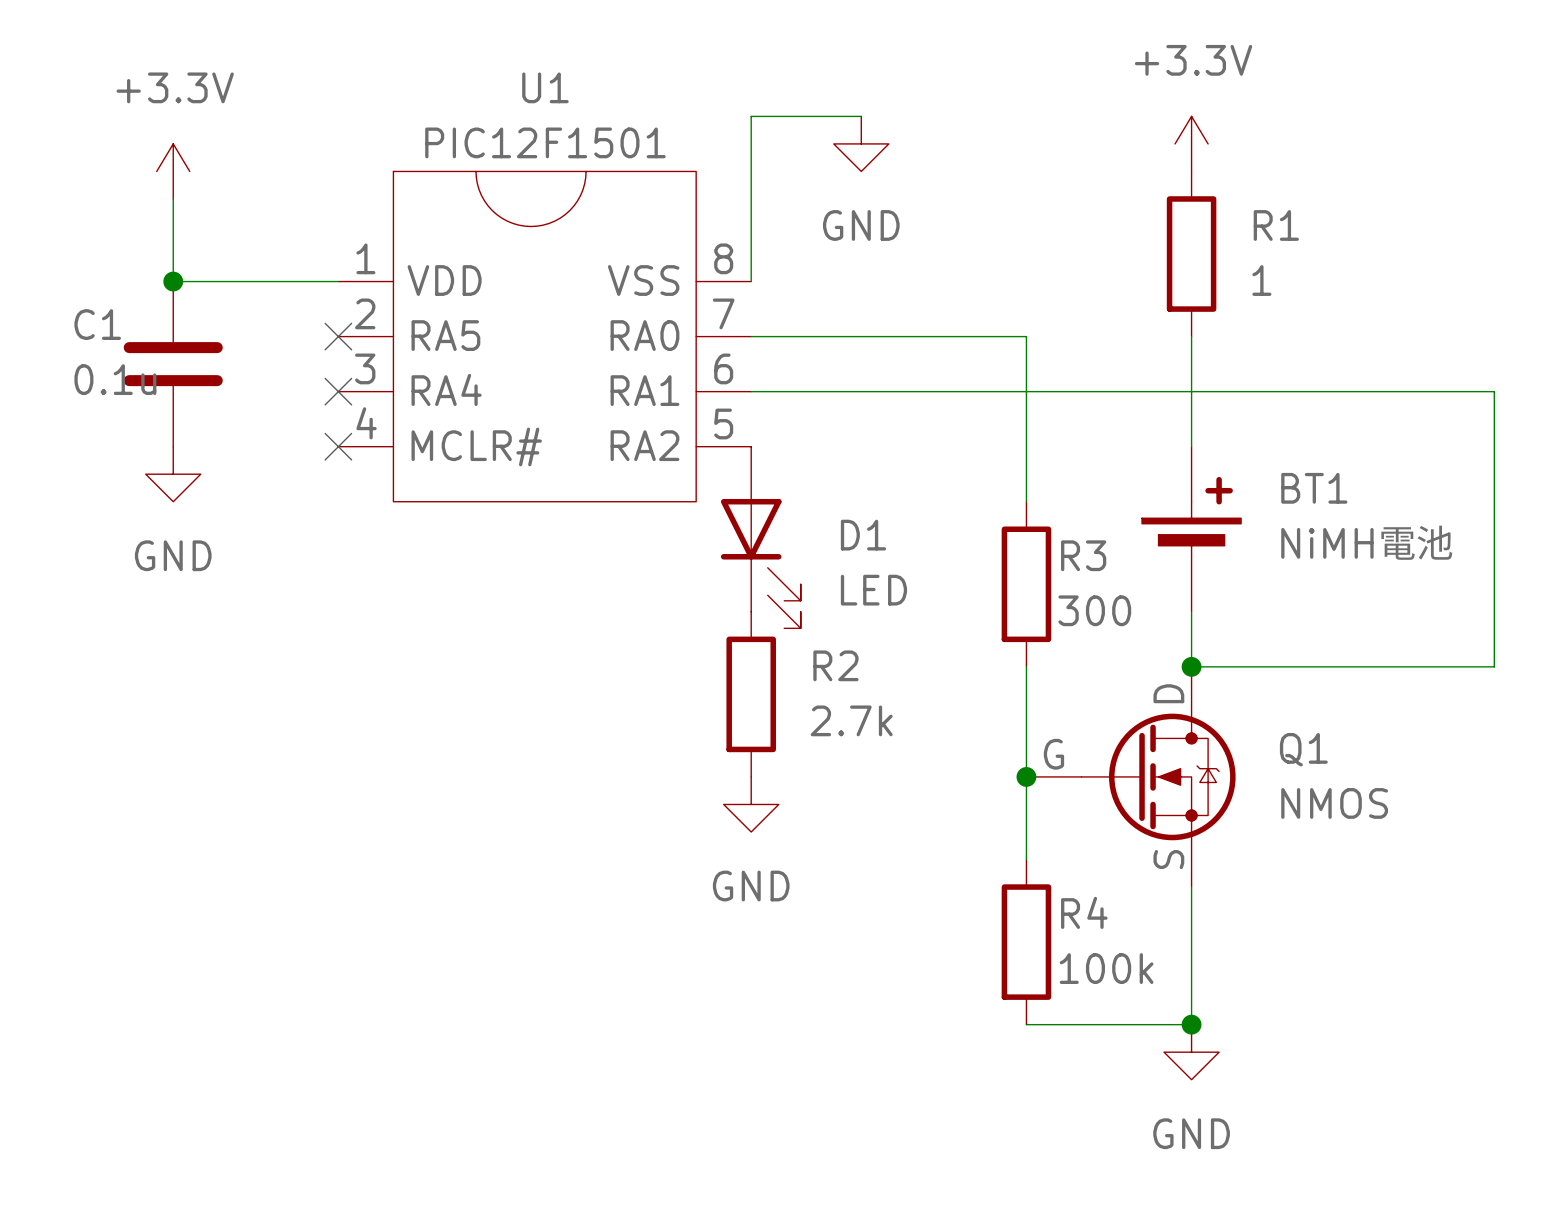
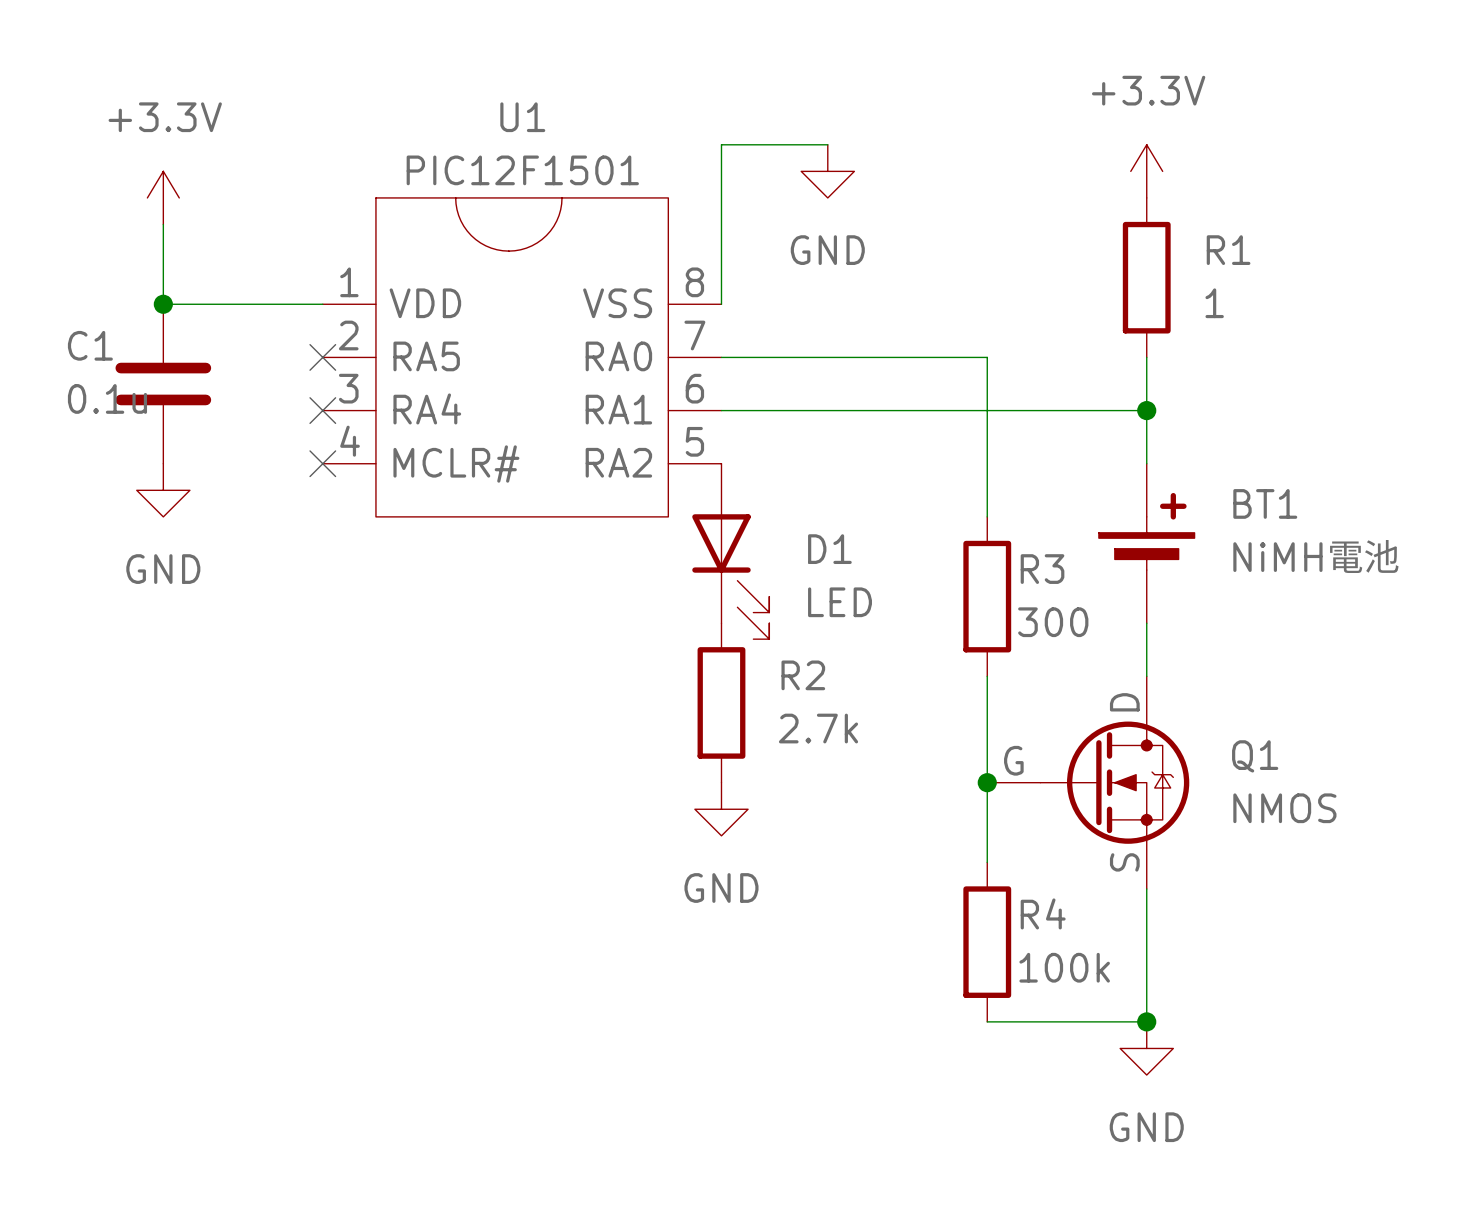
wire: (1191, 391) (1494, 391) (1494, 666) (1191, 666) -> none
junction: none -> (1146, 410)
junction: (1191, 666) -> none

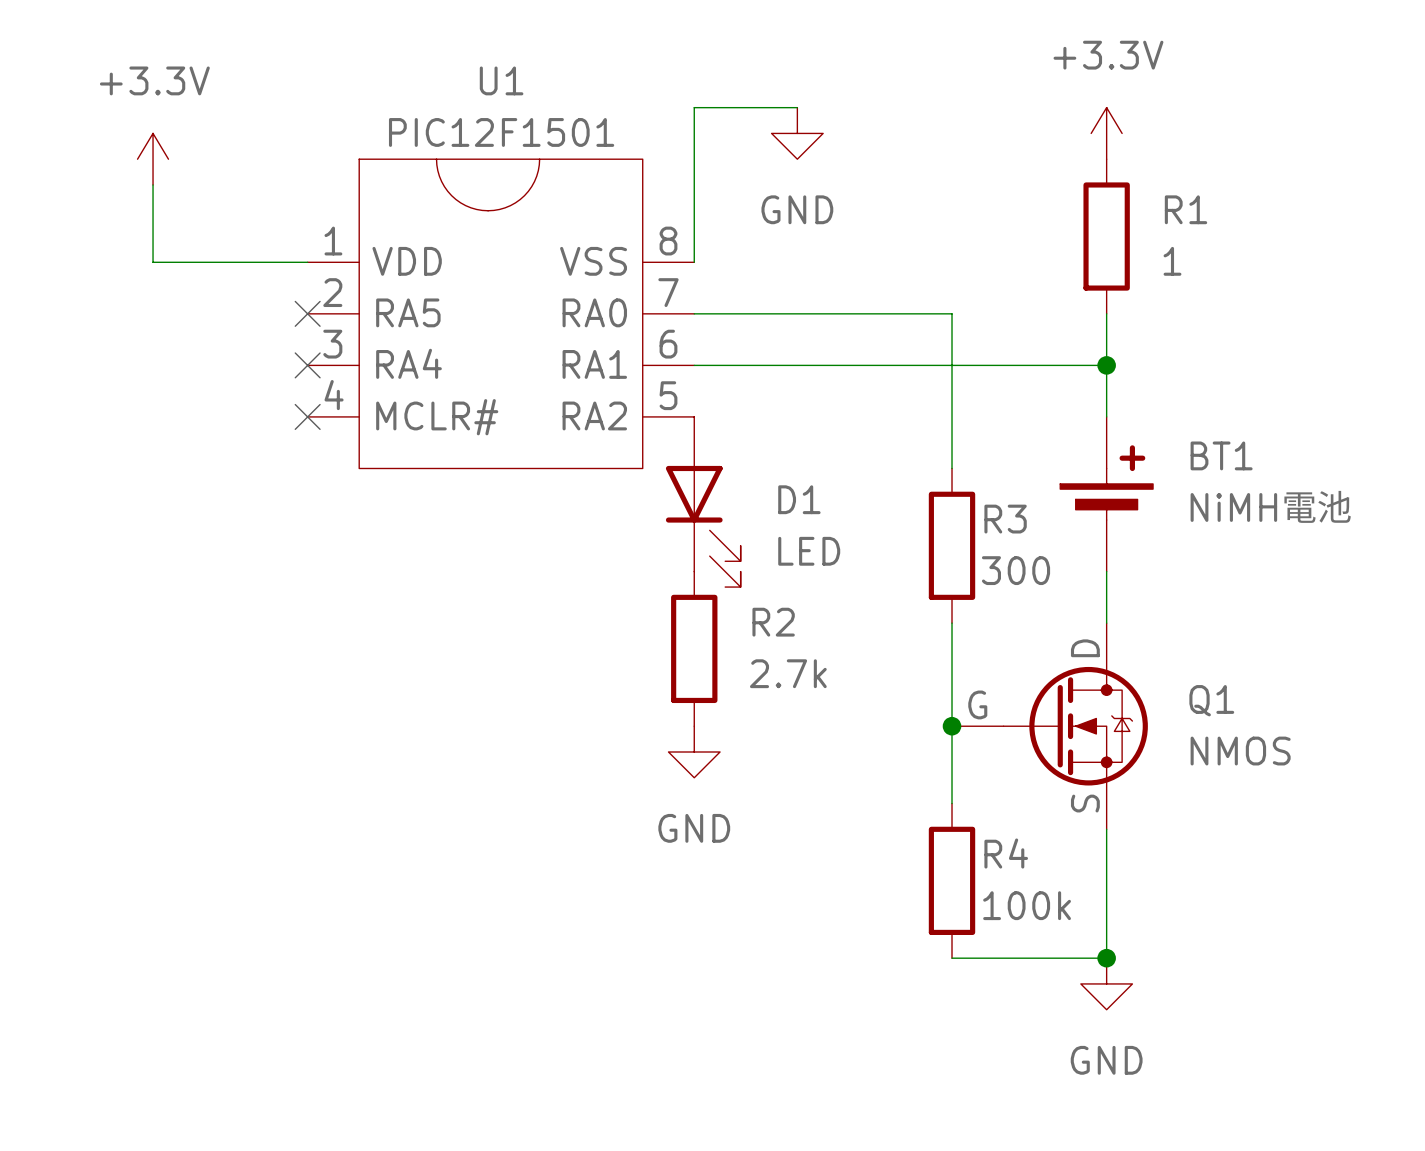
junction: (163, 304) -> none
C1: 0.1u (163, 384) -> none
power symbol: GND (163, 490) -> none

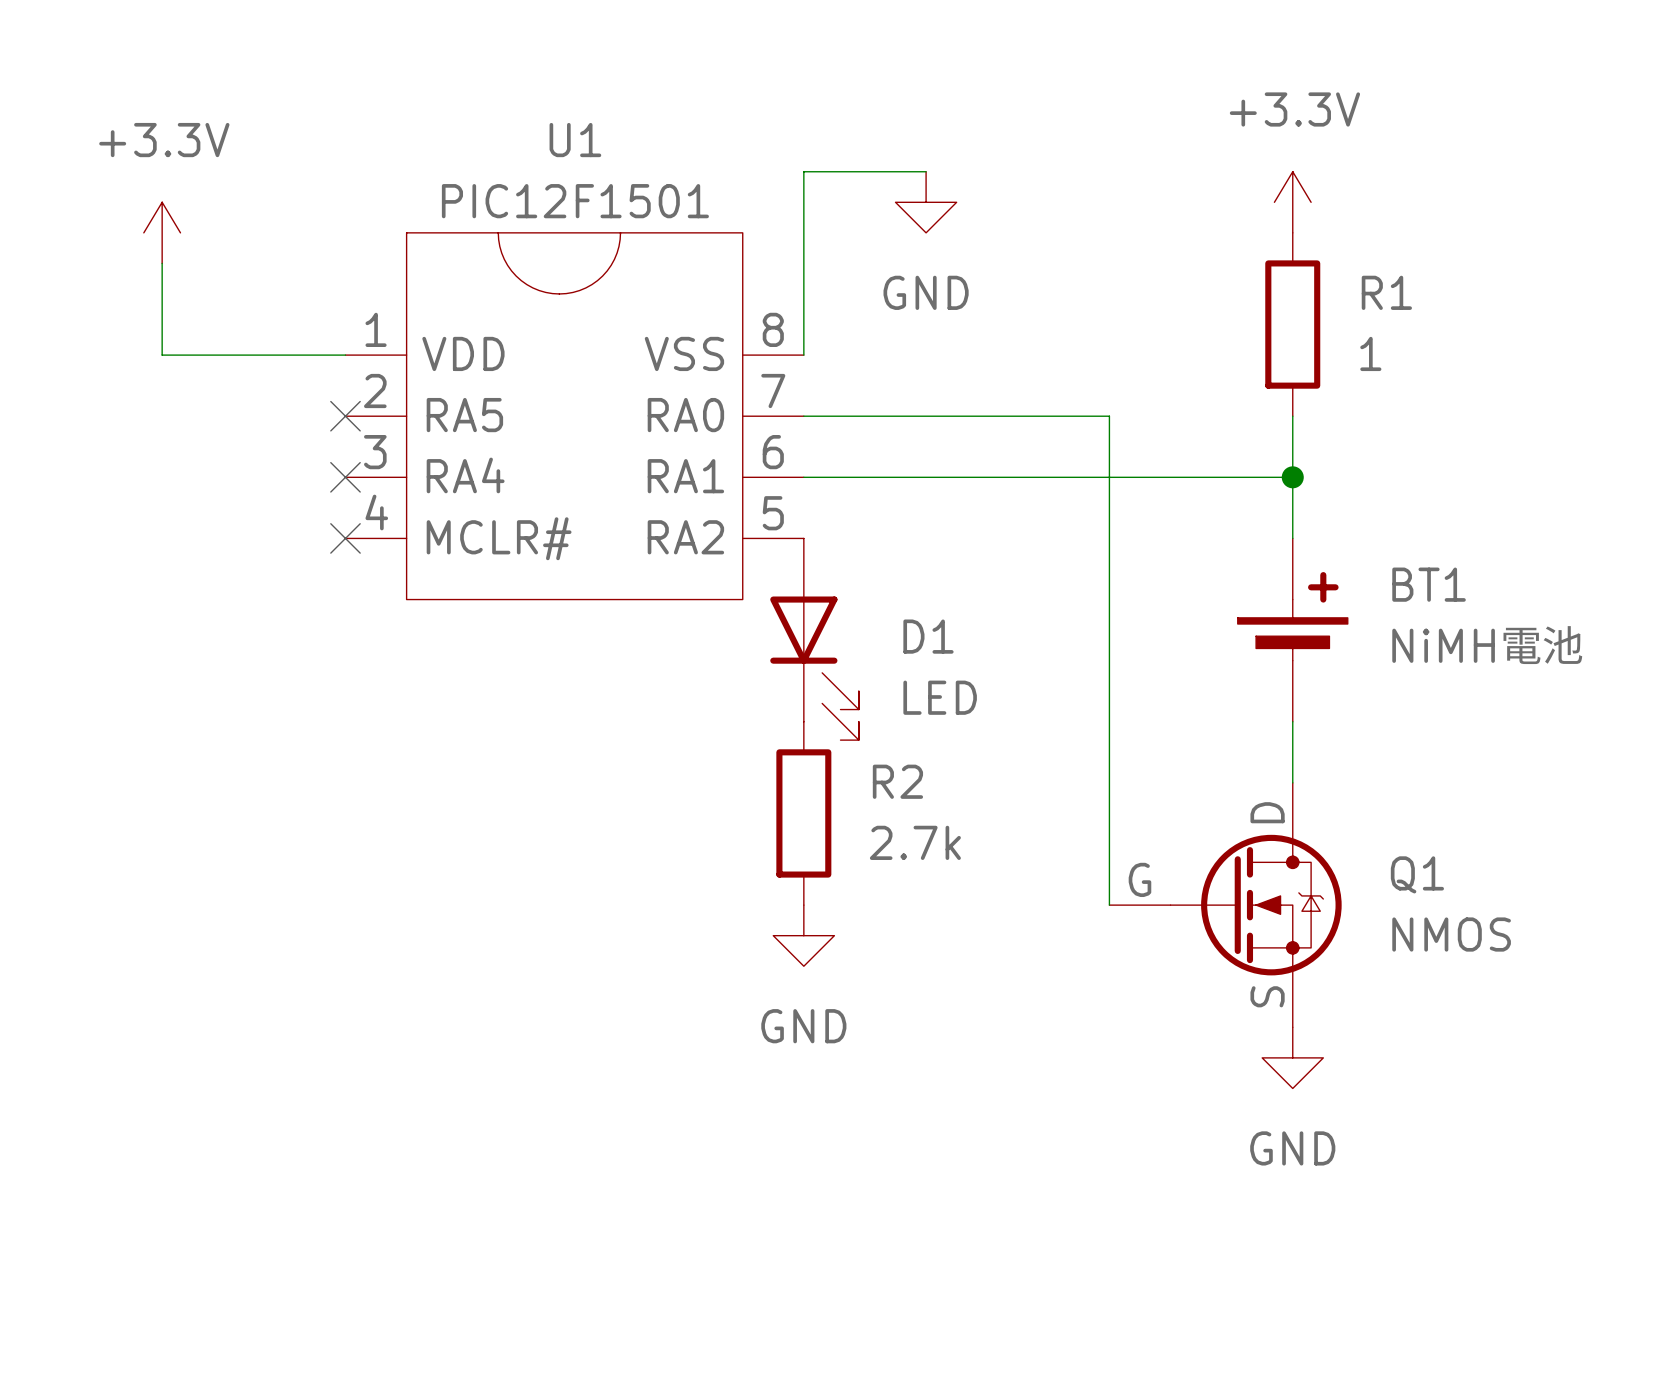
wire: none -> (1109, 599) (1109, 782)
R3: 300 (952, 545) -> none
wire: (952, 726) (952, 803) -> none
junction: (952, 726) -> none
wire: (1106, 829) (1106, 958) (952, 958) -> none
R4: 100k (952, 880) -> none
junction: (1106, 958) -> none
power symbol position: GND (1106, 983) -> GND (1292, 1057)

